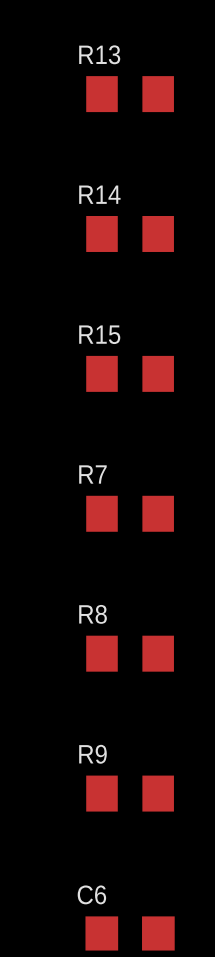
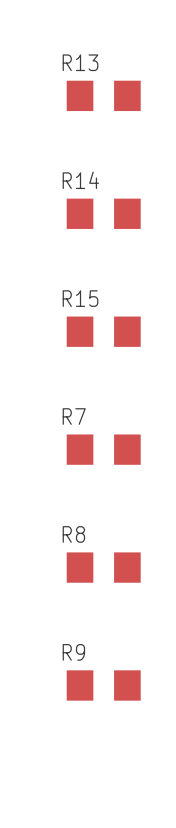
C6: (130, 933) -> none

